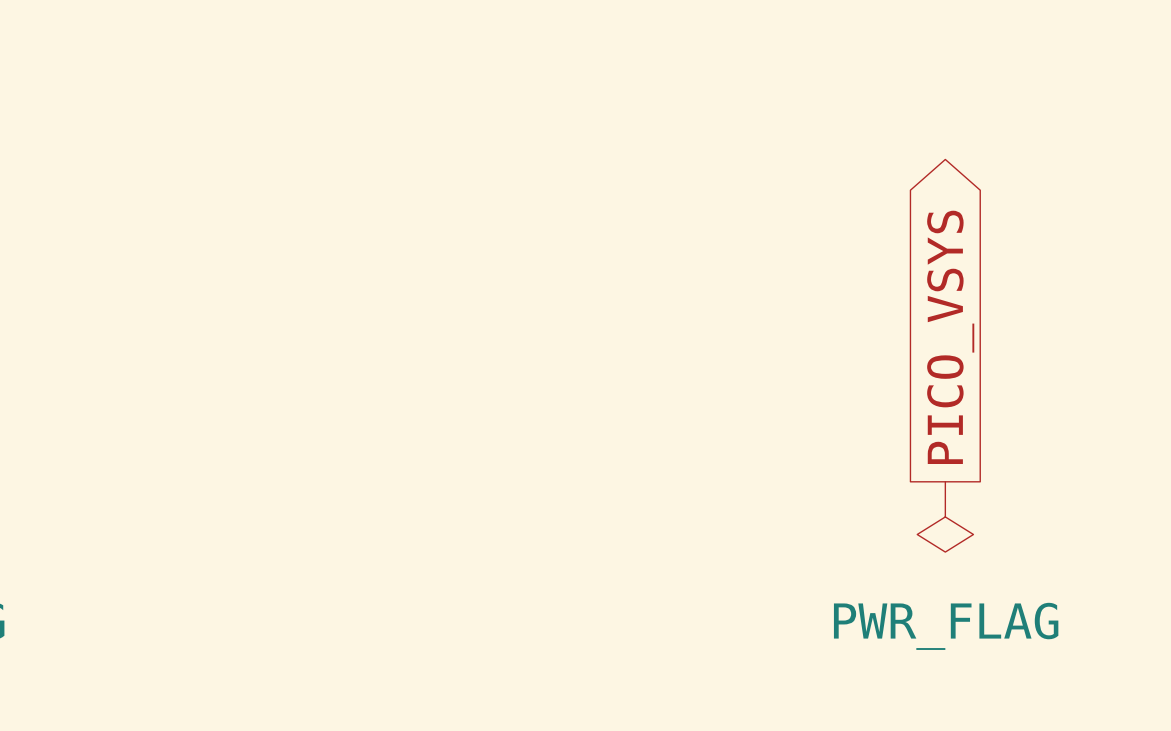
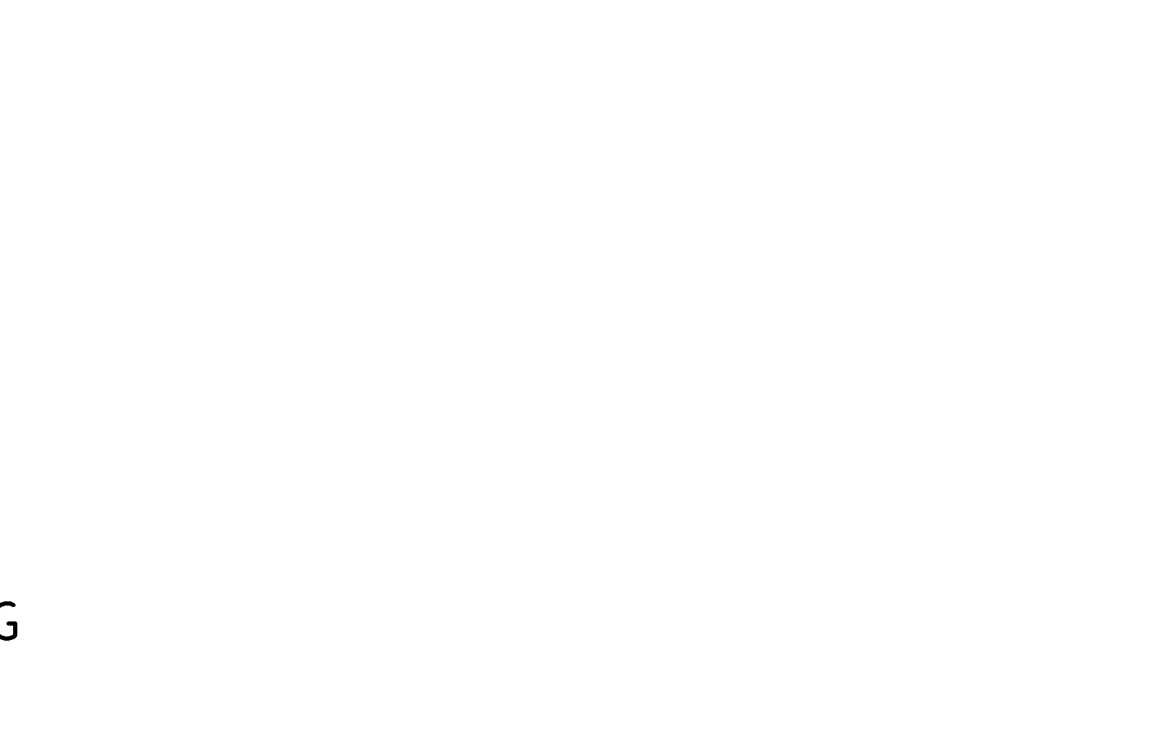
global label: PICO_VSYS (950, 337) -> none
power symbol: PWR_FLAG (945, 516) -> none

